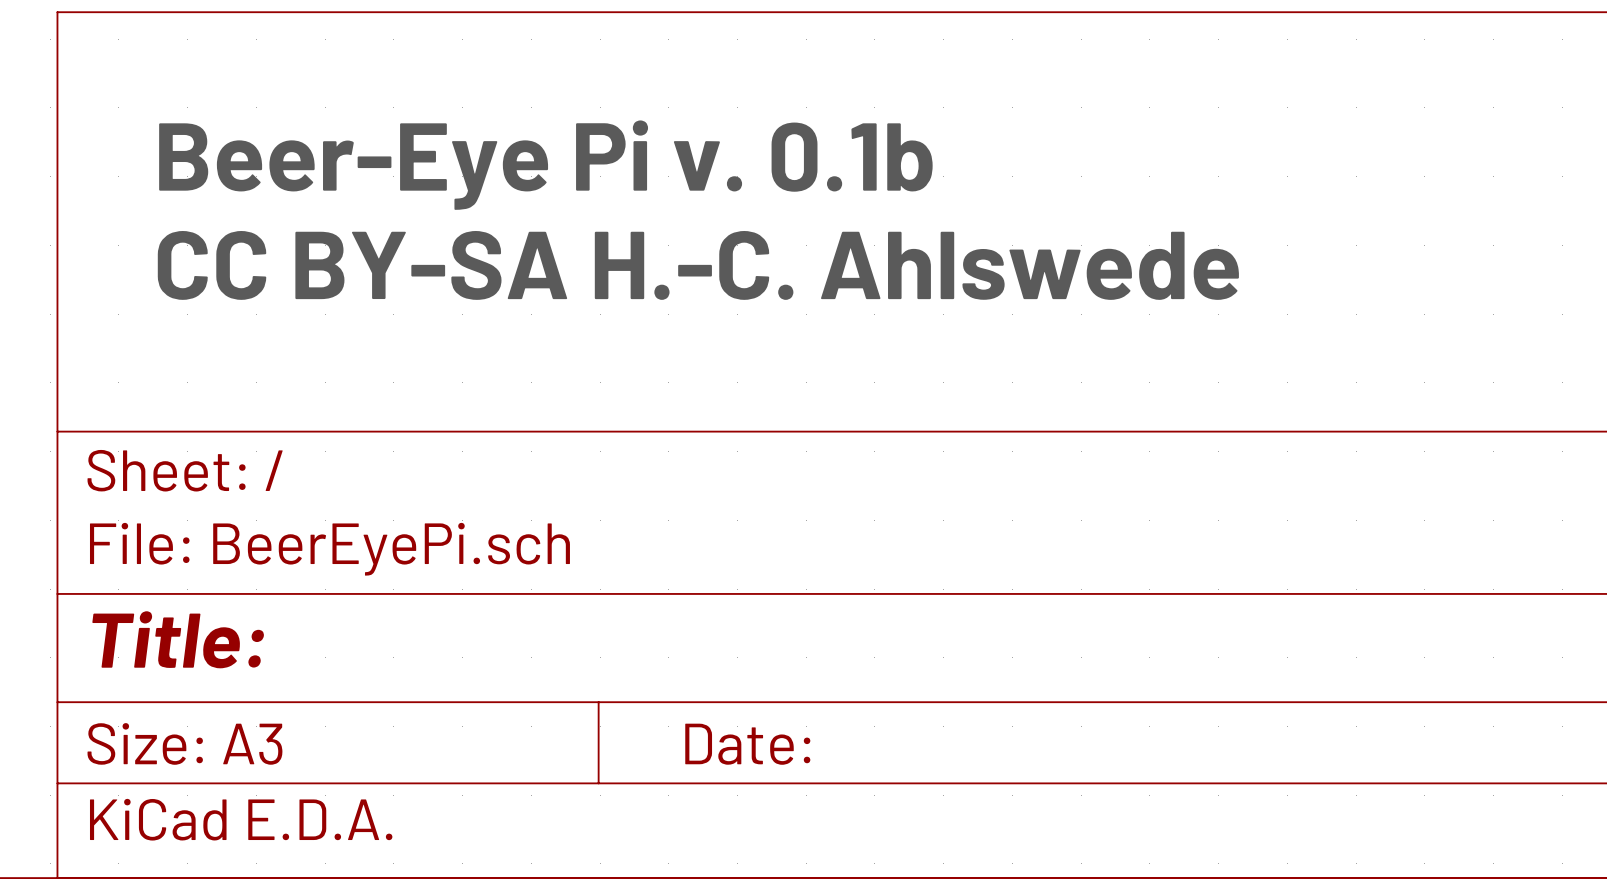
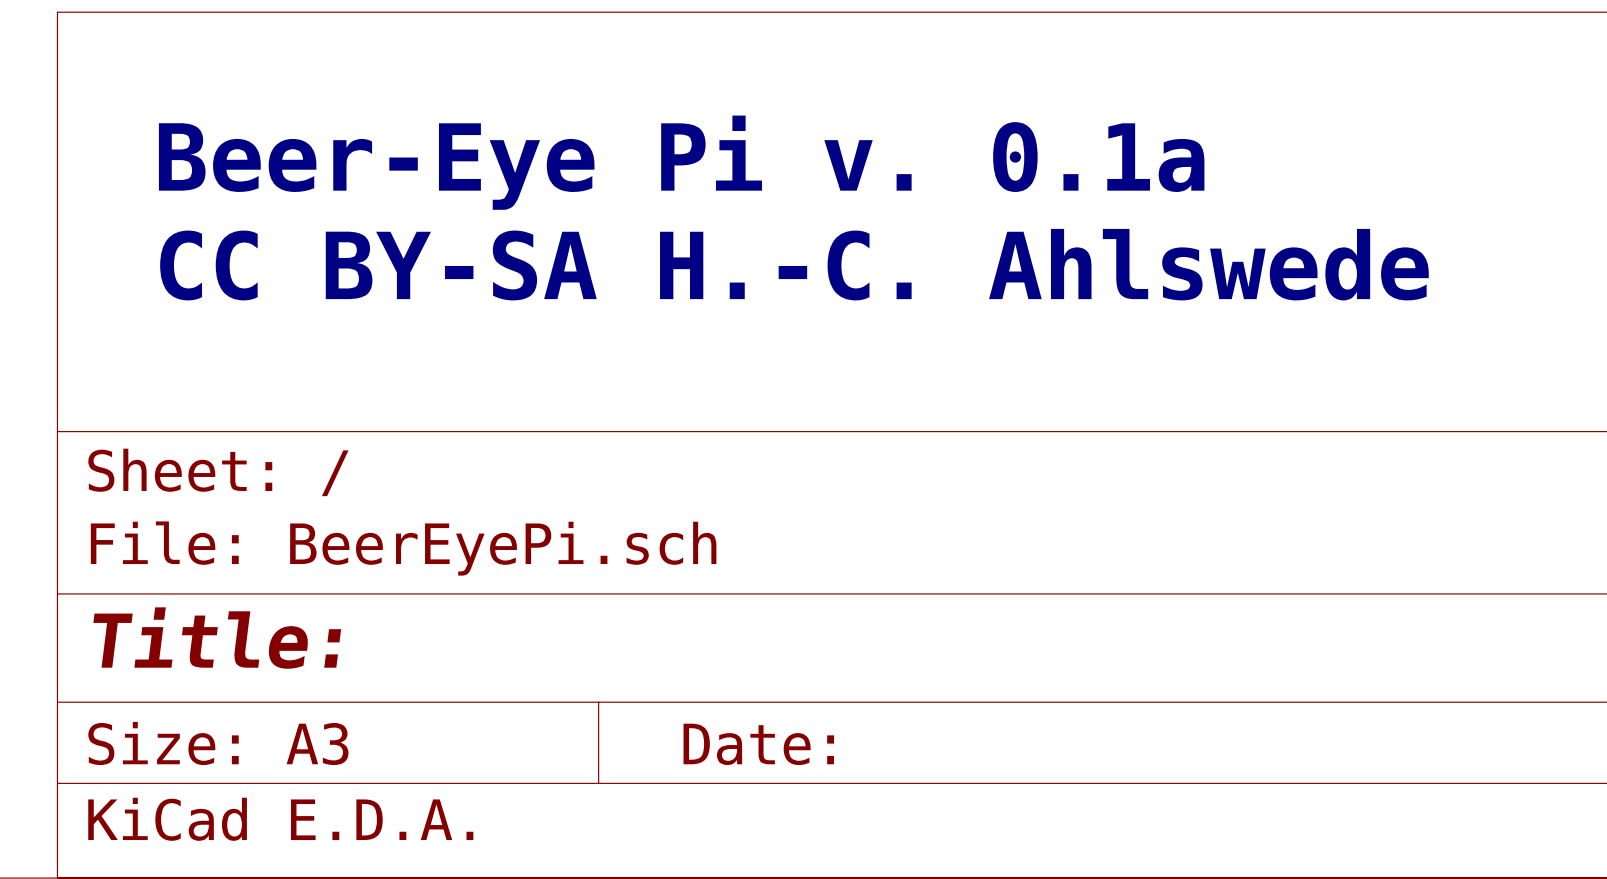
text: Beer-Eye Pi v. 0.1b (545, 165) -> Beer-Eye Pi v. 0.1a (681, 162)

